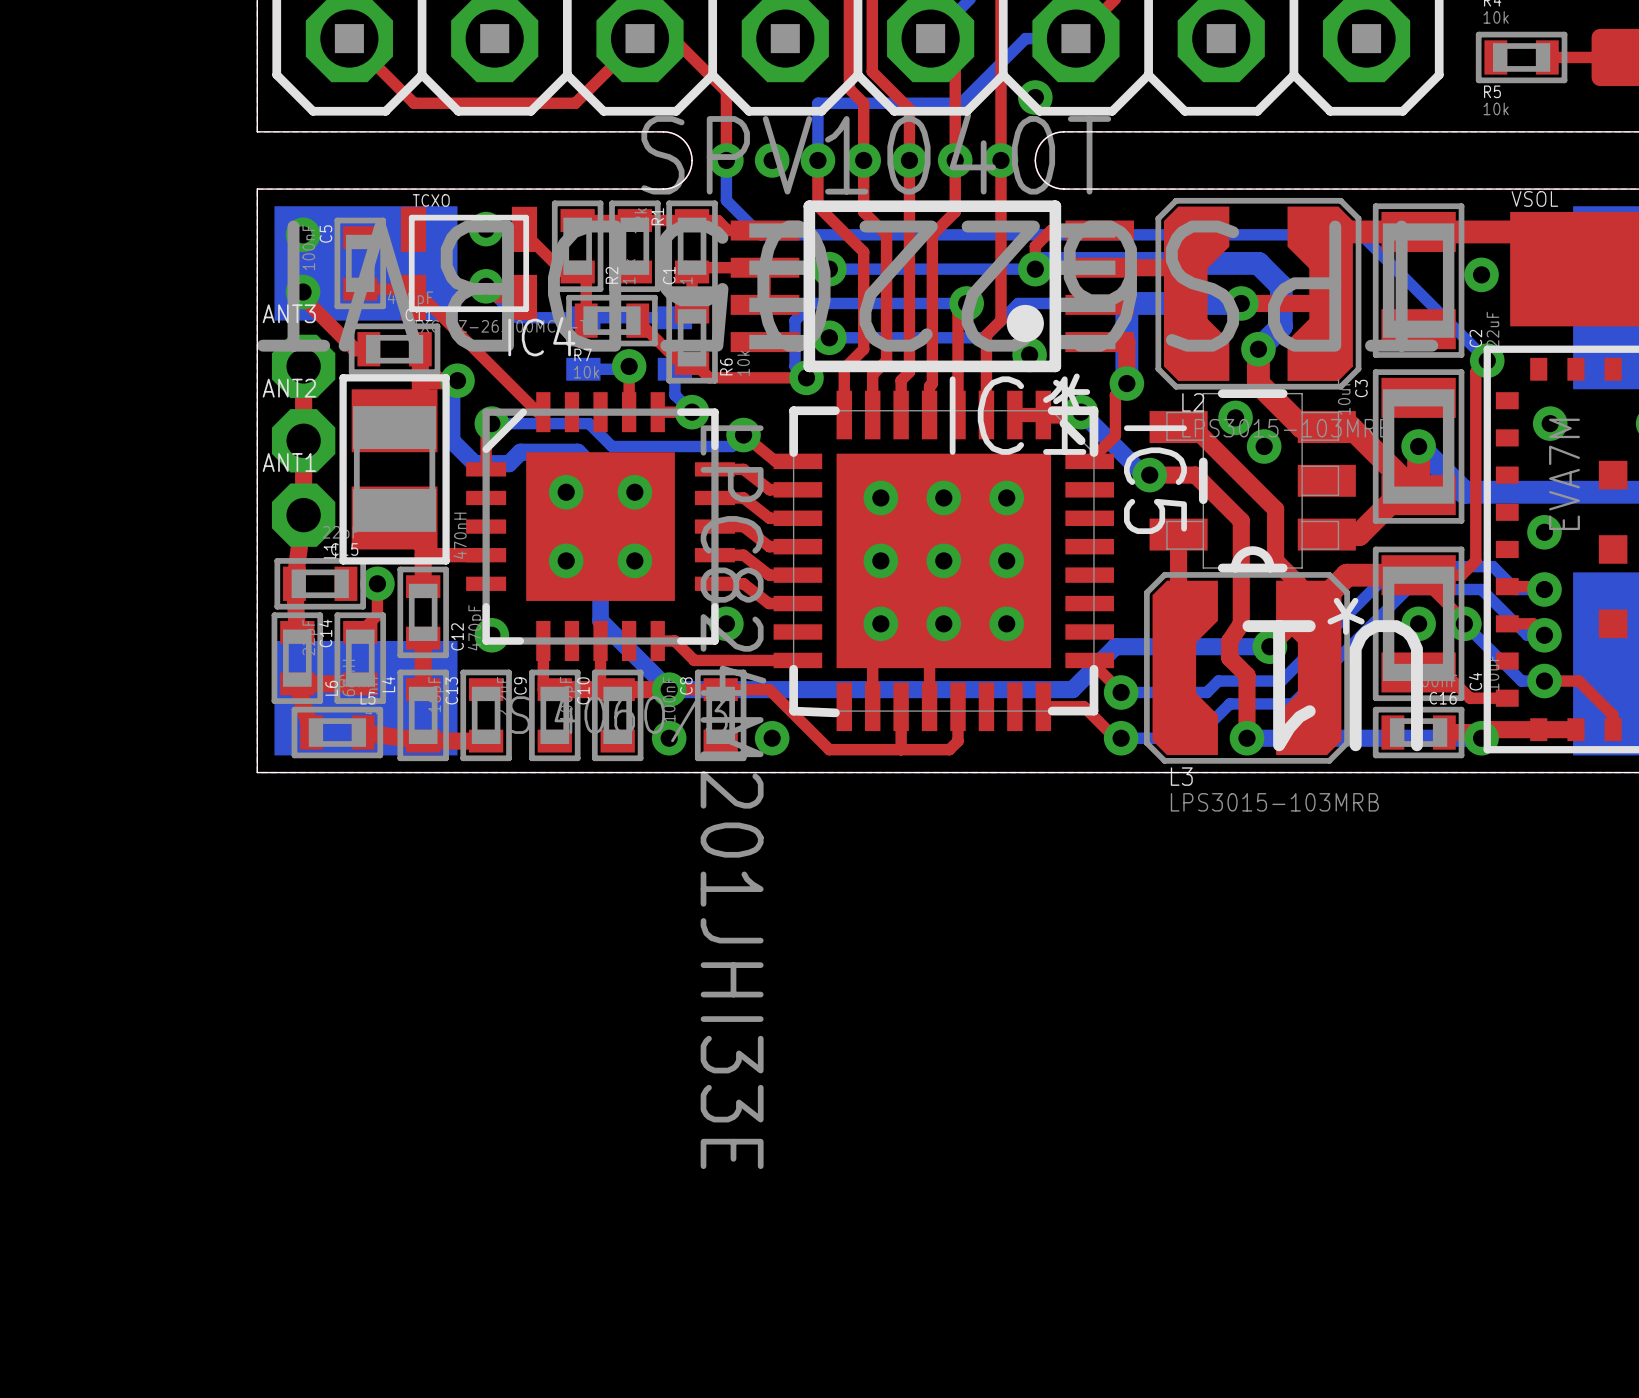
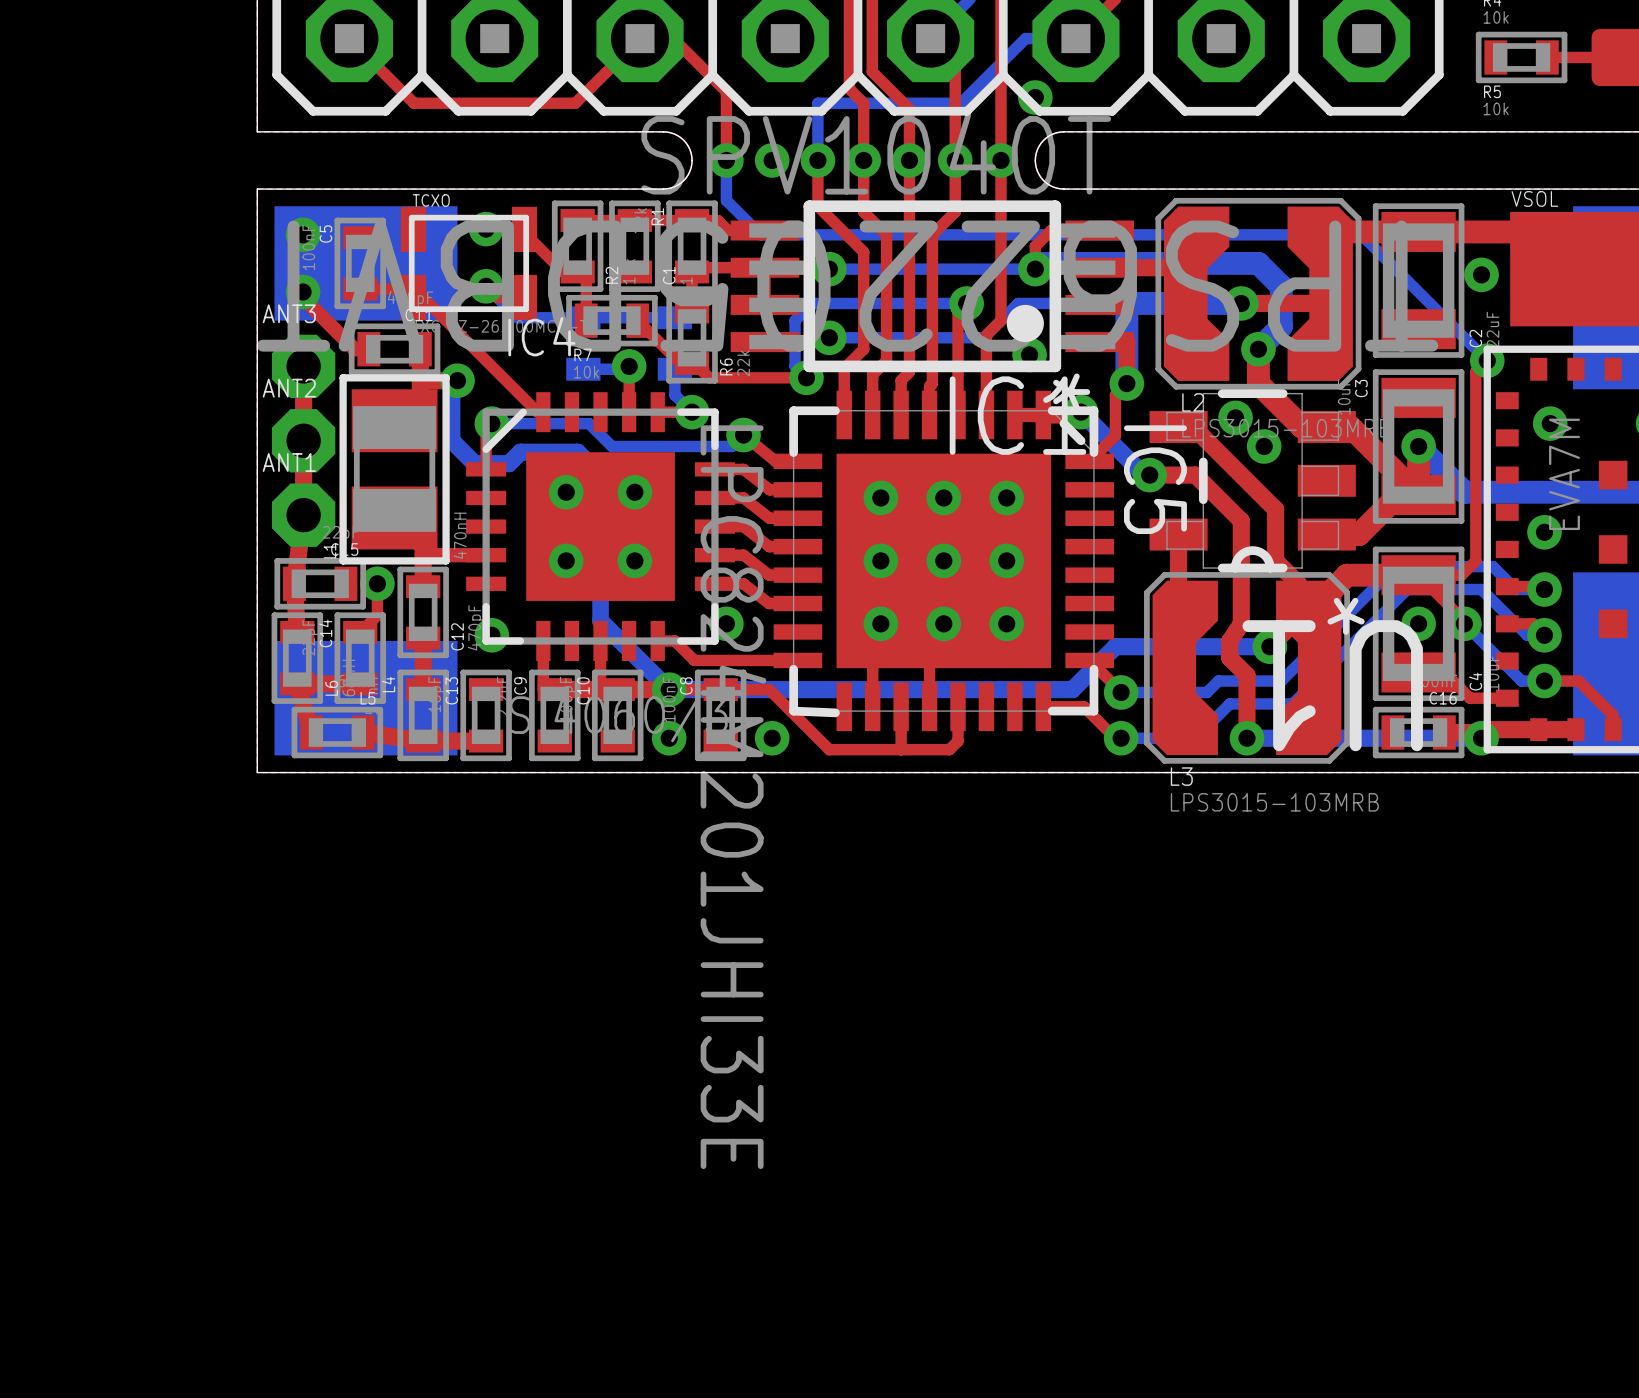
R6 value: 10k (743, 363) -> 22k (743, 363)

